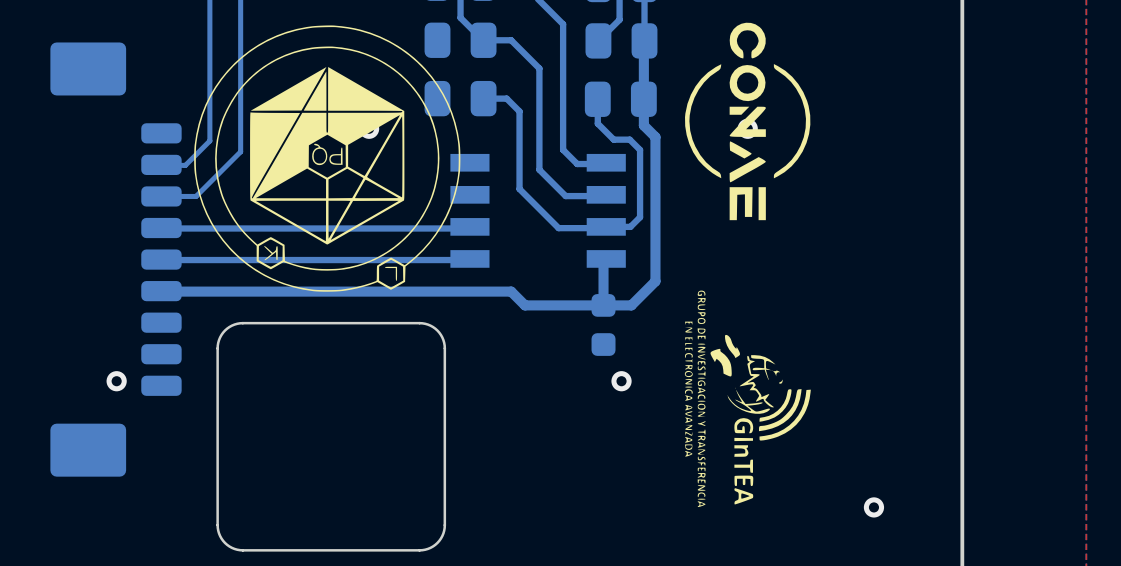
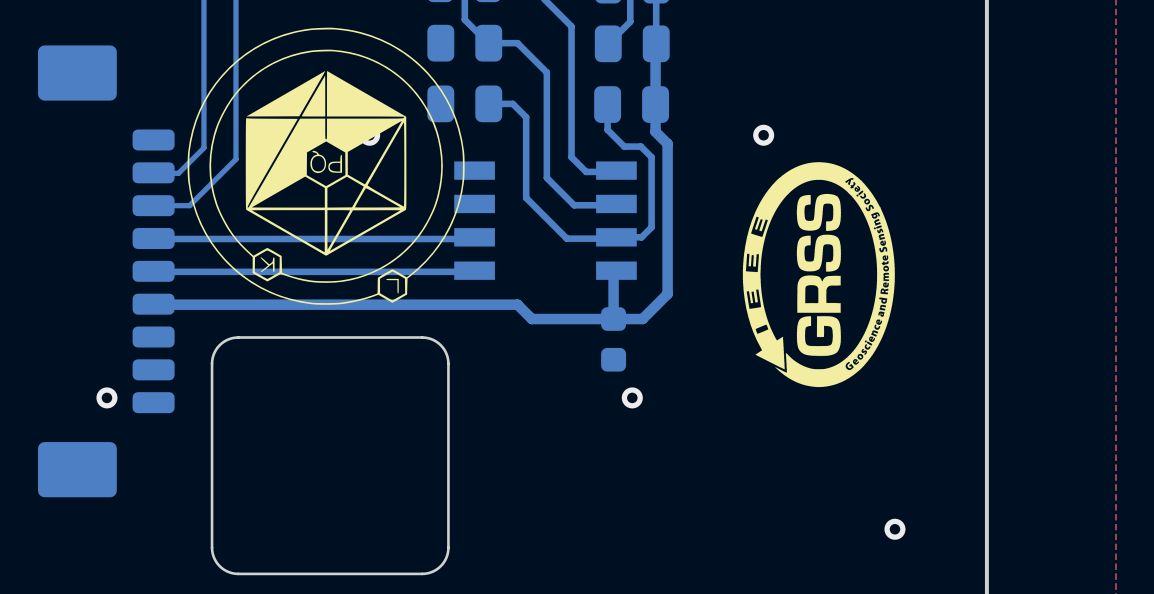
drawing: [685, 22, 811, 221] -> none
drawing: none -> [742, 162, 895, 388]
drawing: [684, 290, 811, 508] -> none

